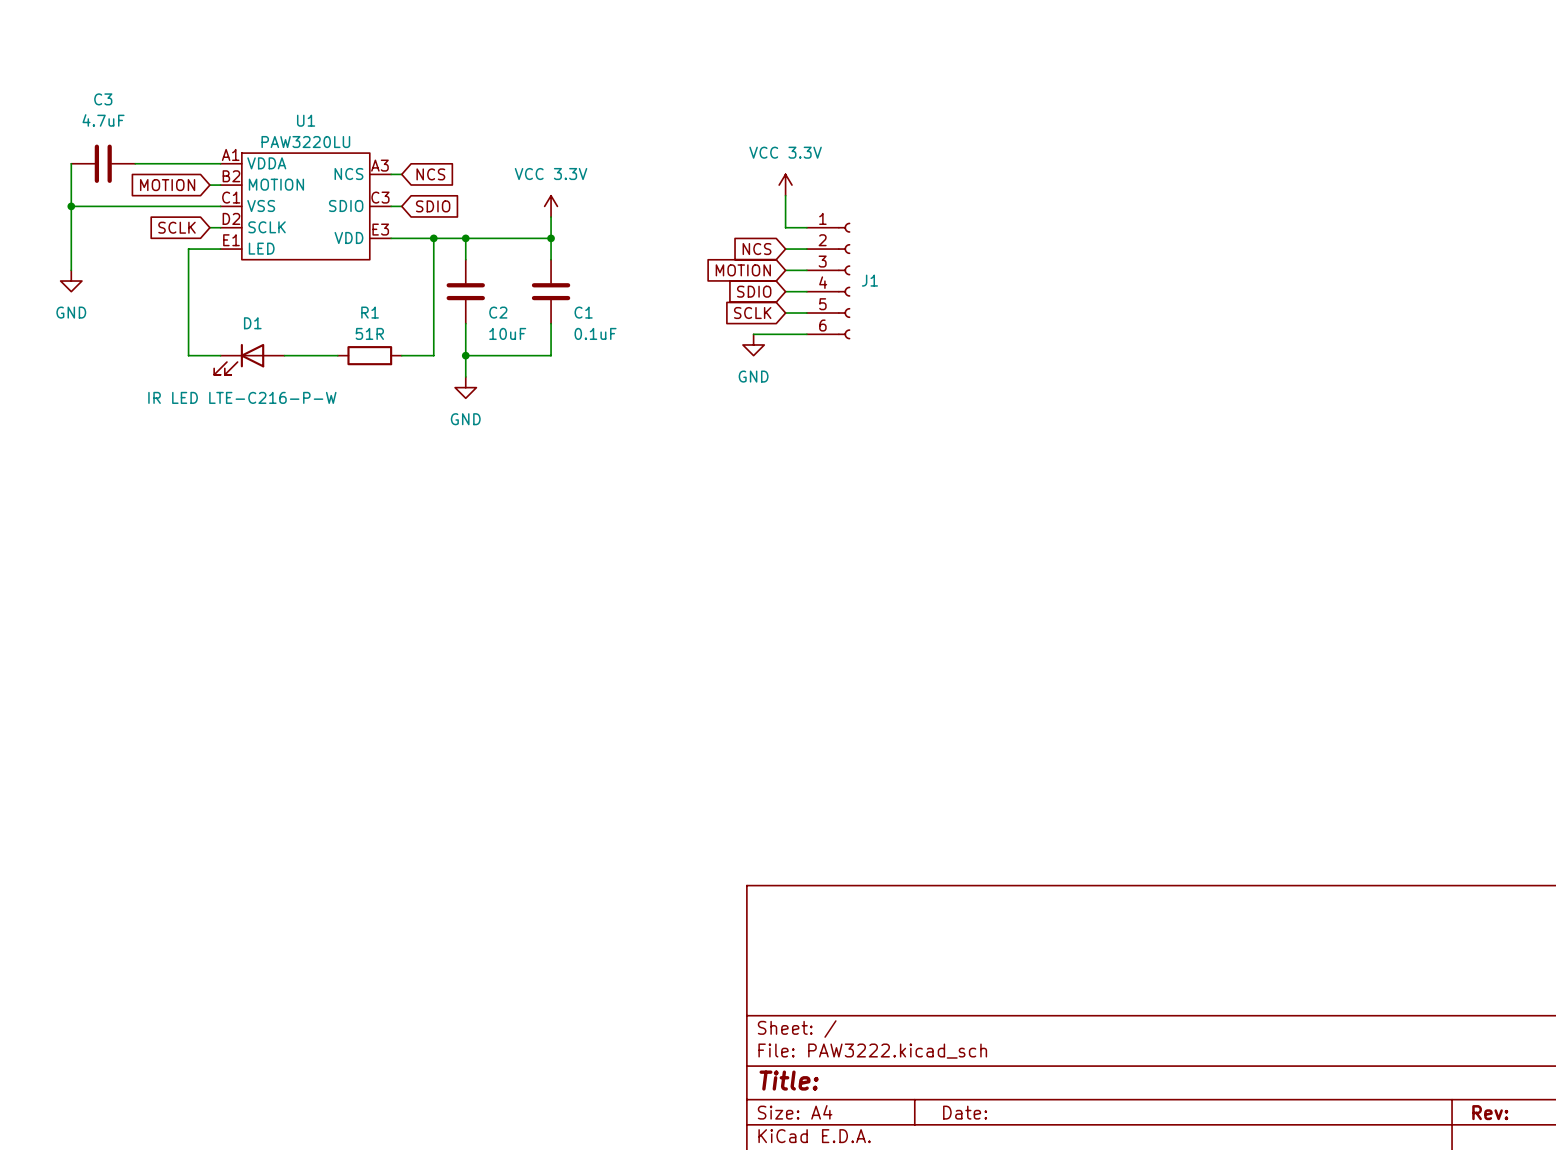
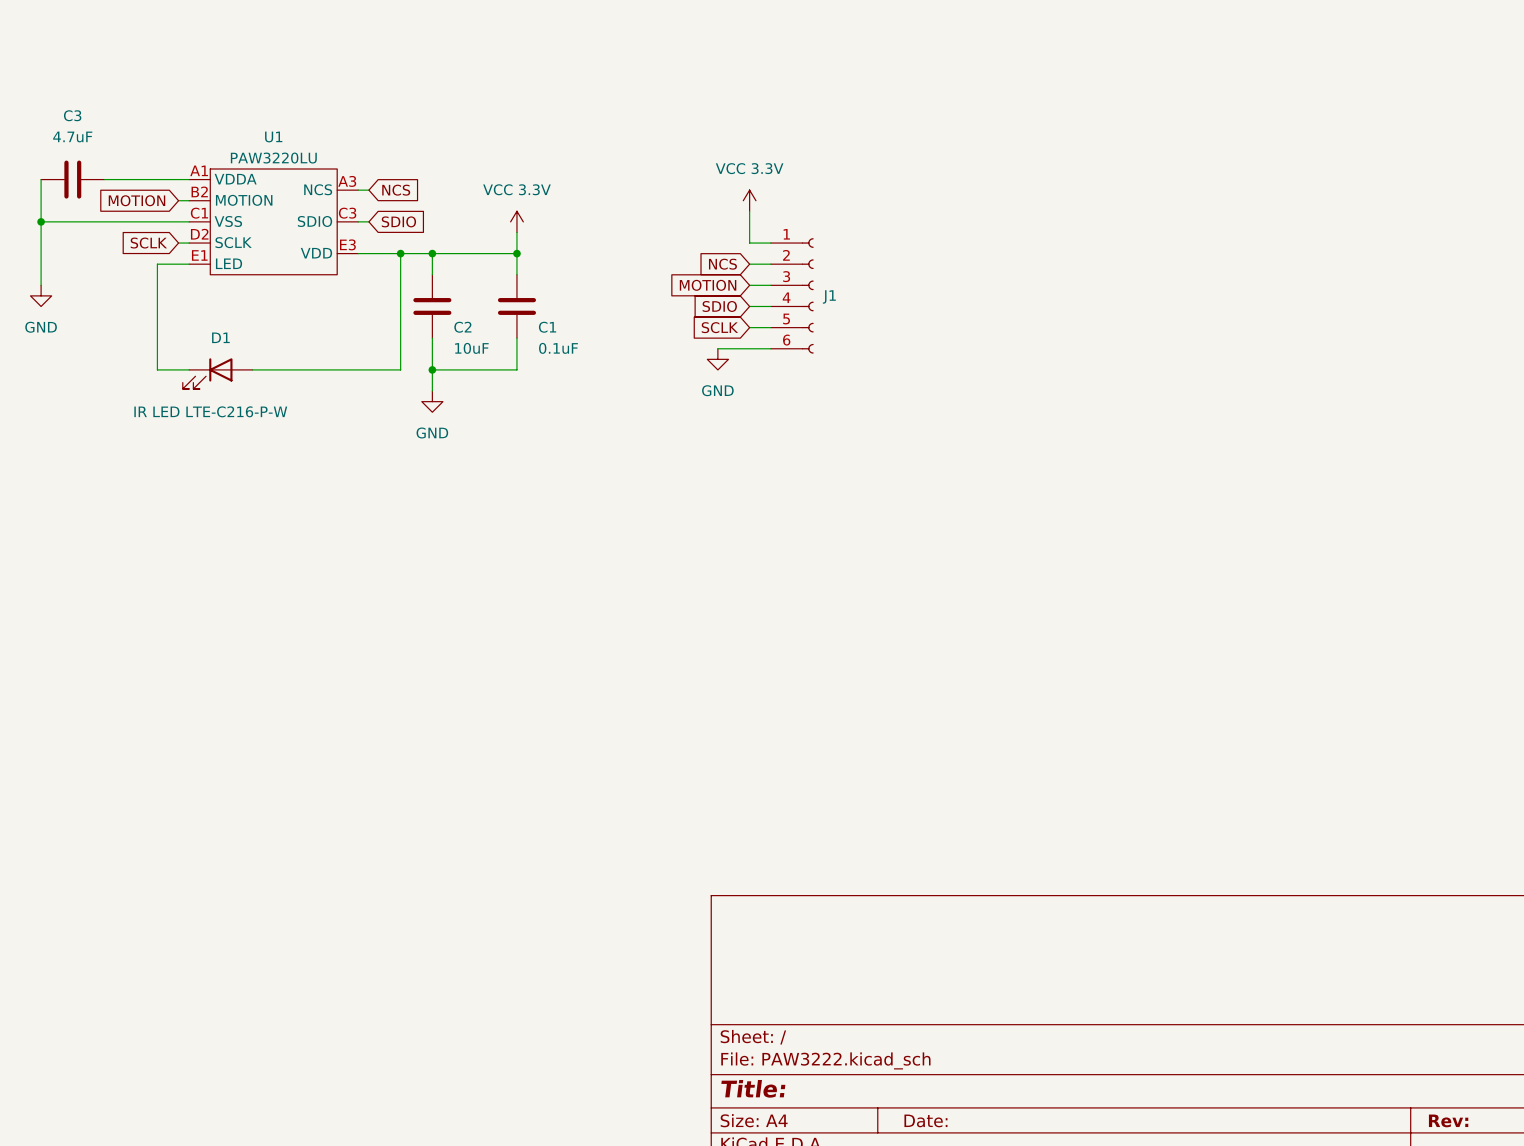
wire: none -> (305, 369) (368, 369)
R1: 51R (369, 355) -> none

